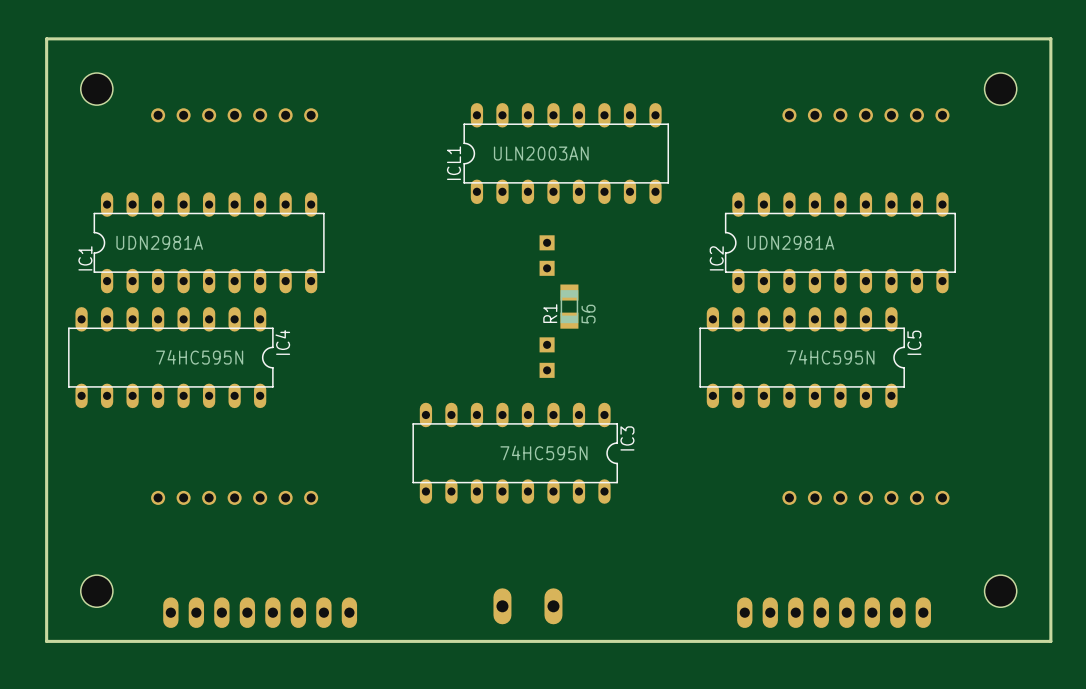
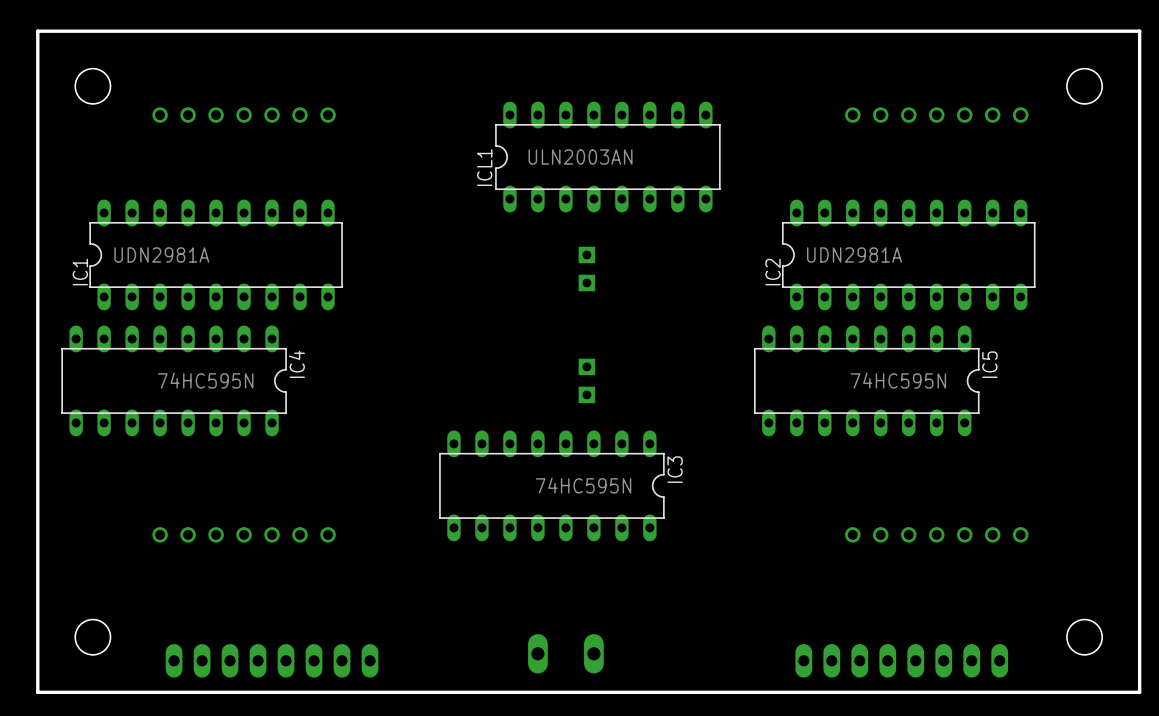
R1: 56 (569, 306) -> none

